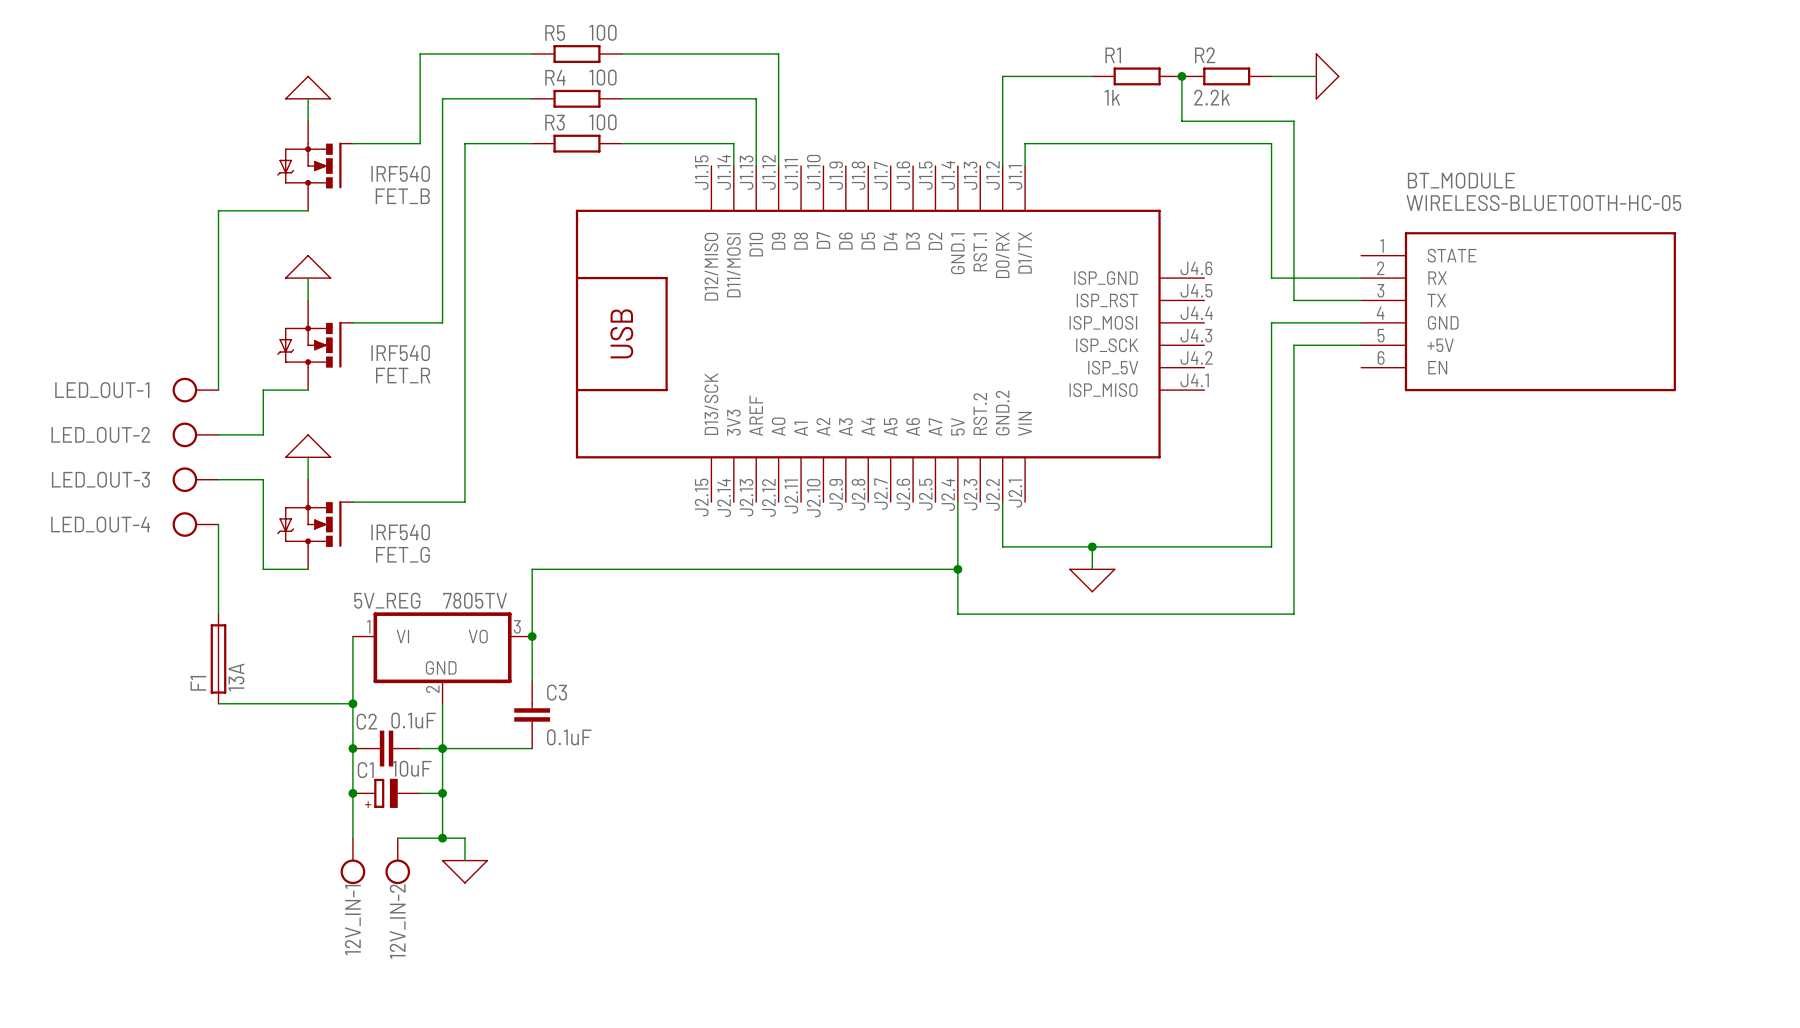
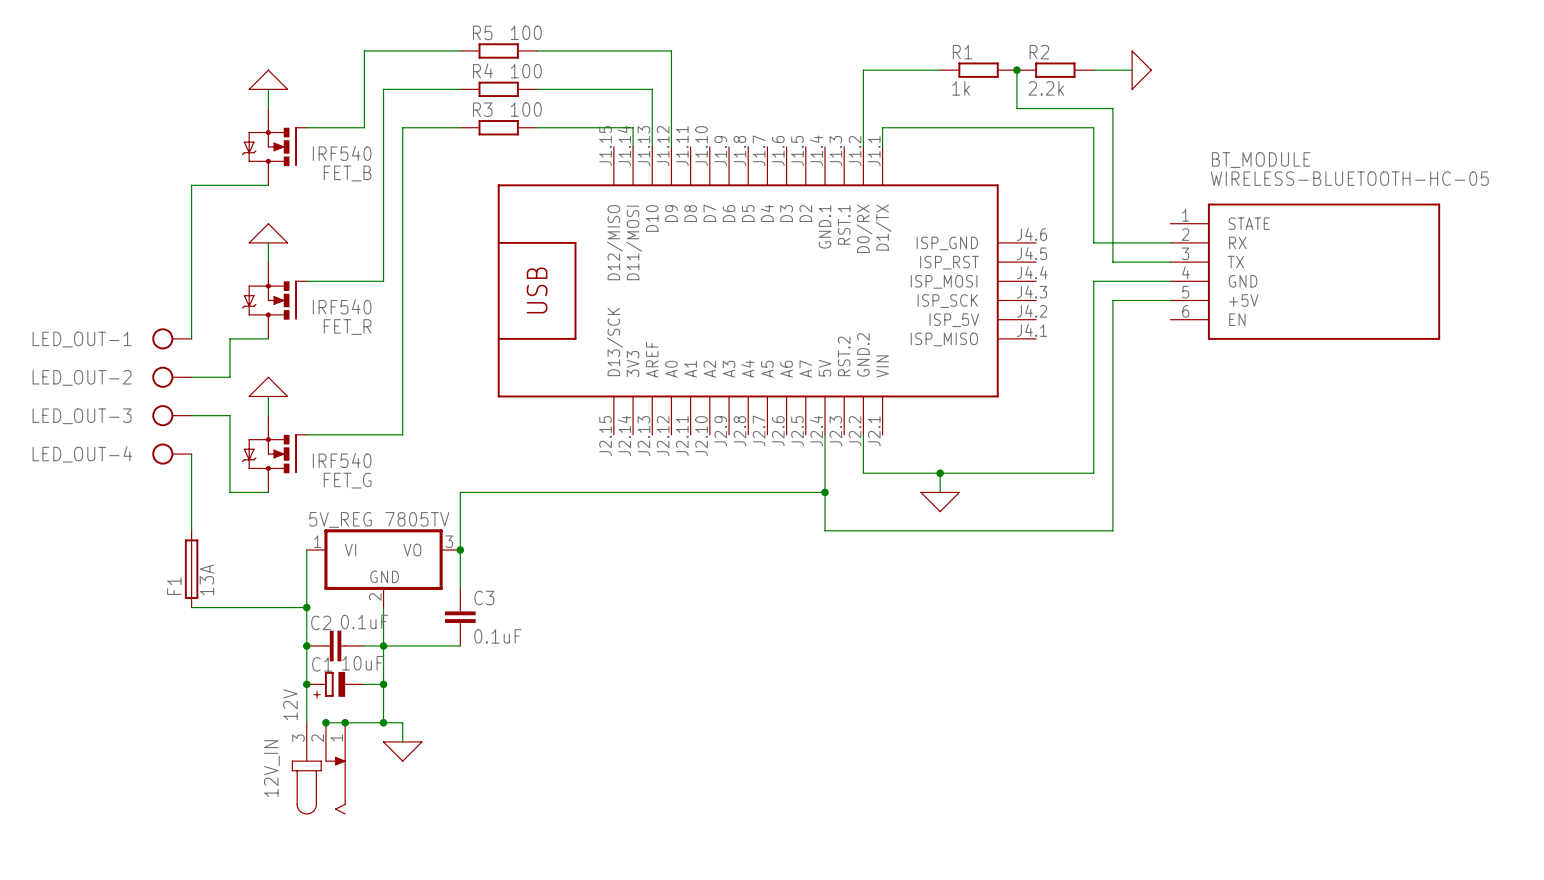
wire: none -> (325, 722) (345, 722)
junction: none -> (325, 722)
junction: none -> (345, 722)
12V_IN-1: (352, 861) -> none
12V_IN-2: (397, 861) -> none
12V_IN: none -> 12V (318, 768)

